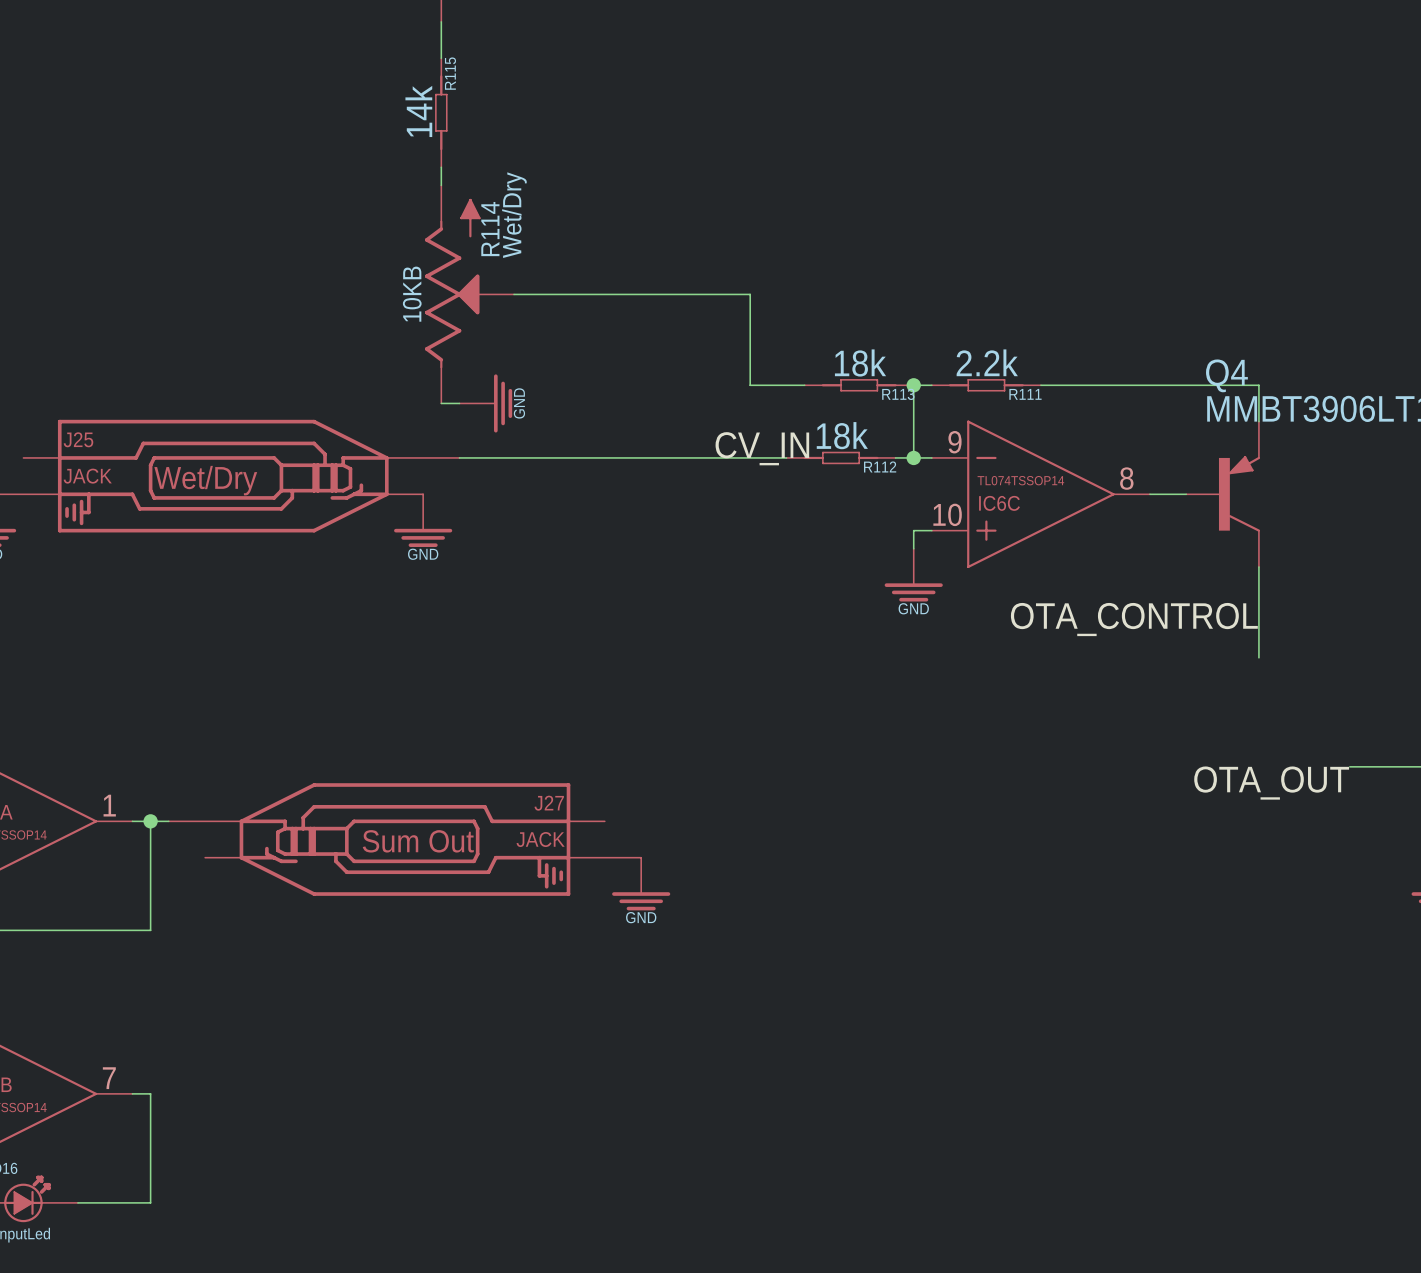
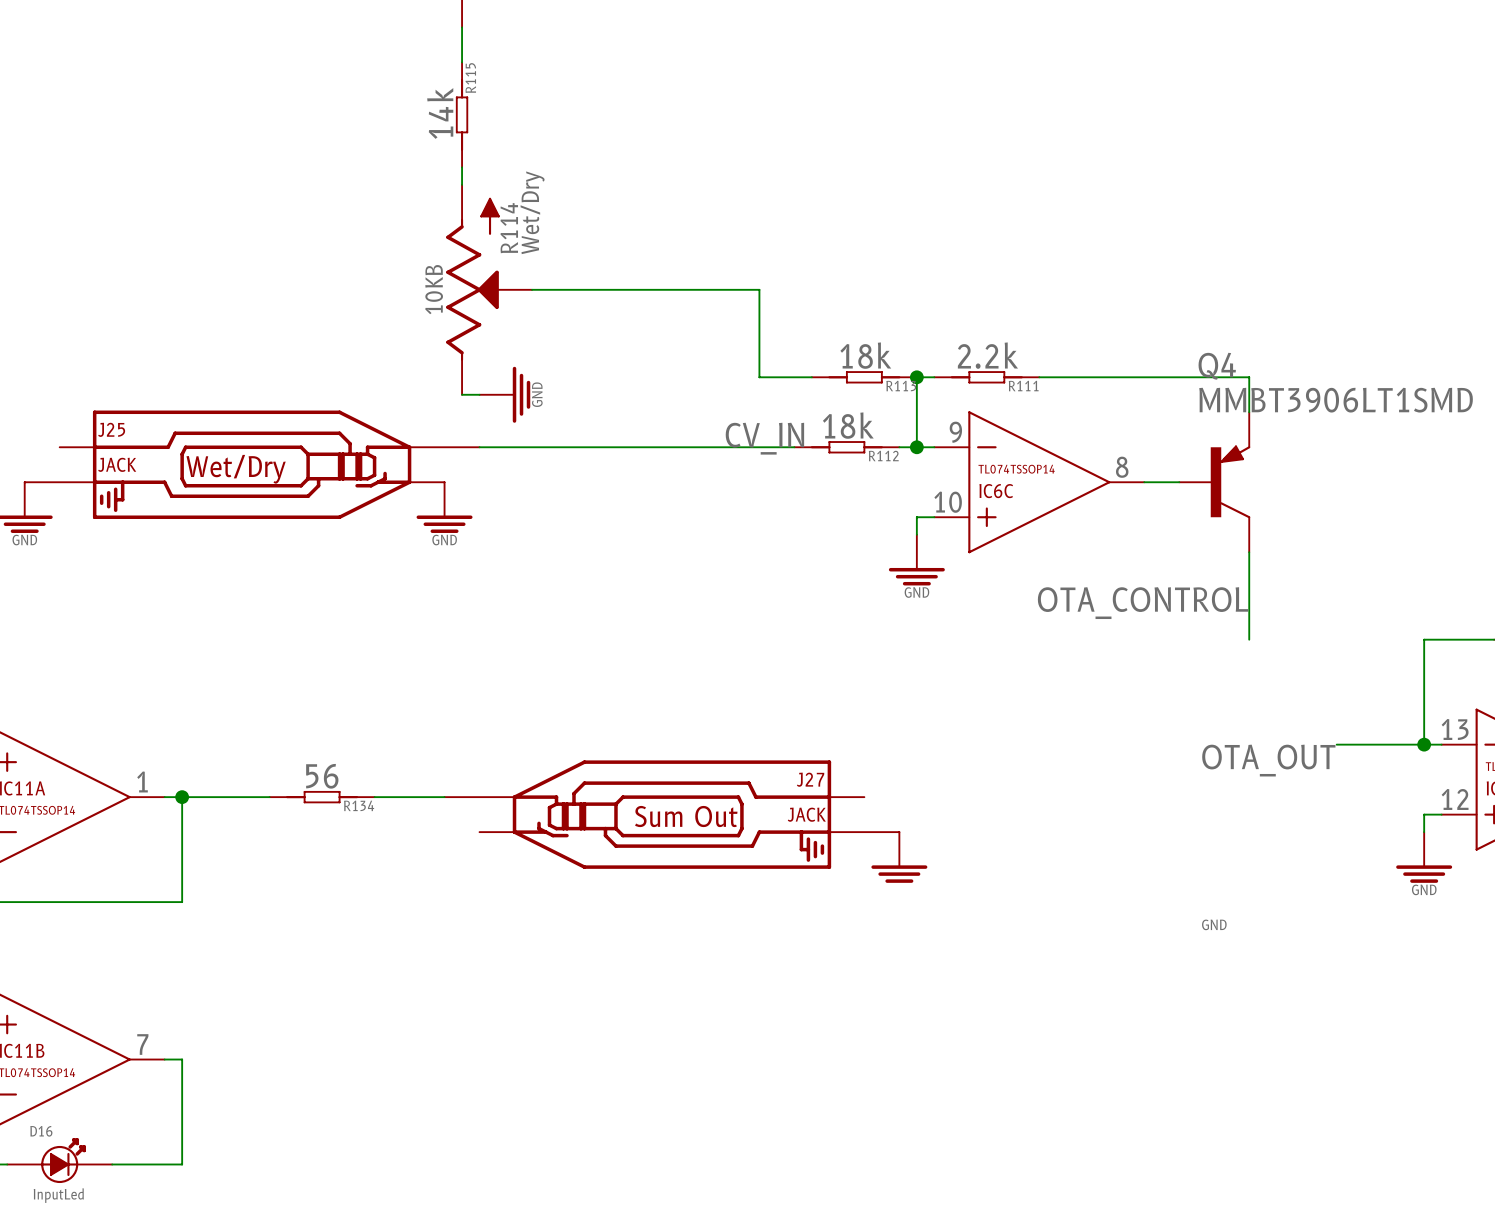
R134: none -> 56 (322, 797)
J27 position: (404, 839) -> (671, 814)
power symbol position: GND (641, 884) -> GND (899, 857)
power symbol text position: GND (641, 917) -> GND (1214, 924)

